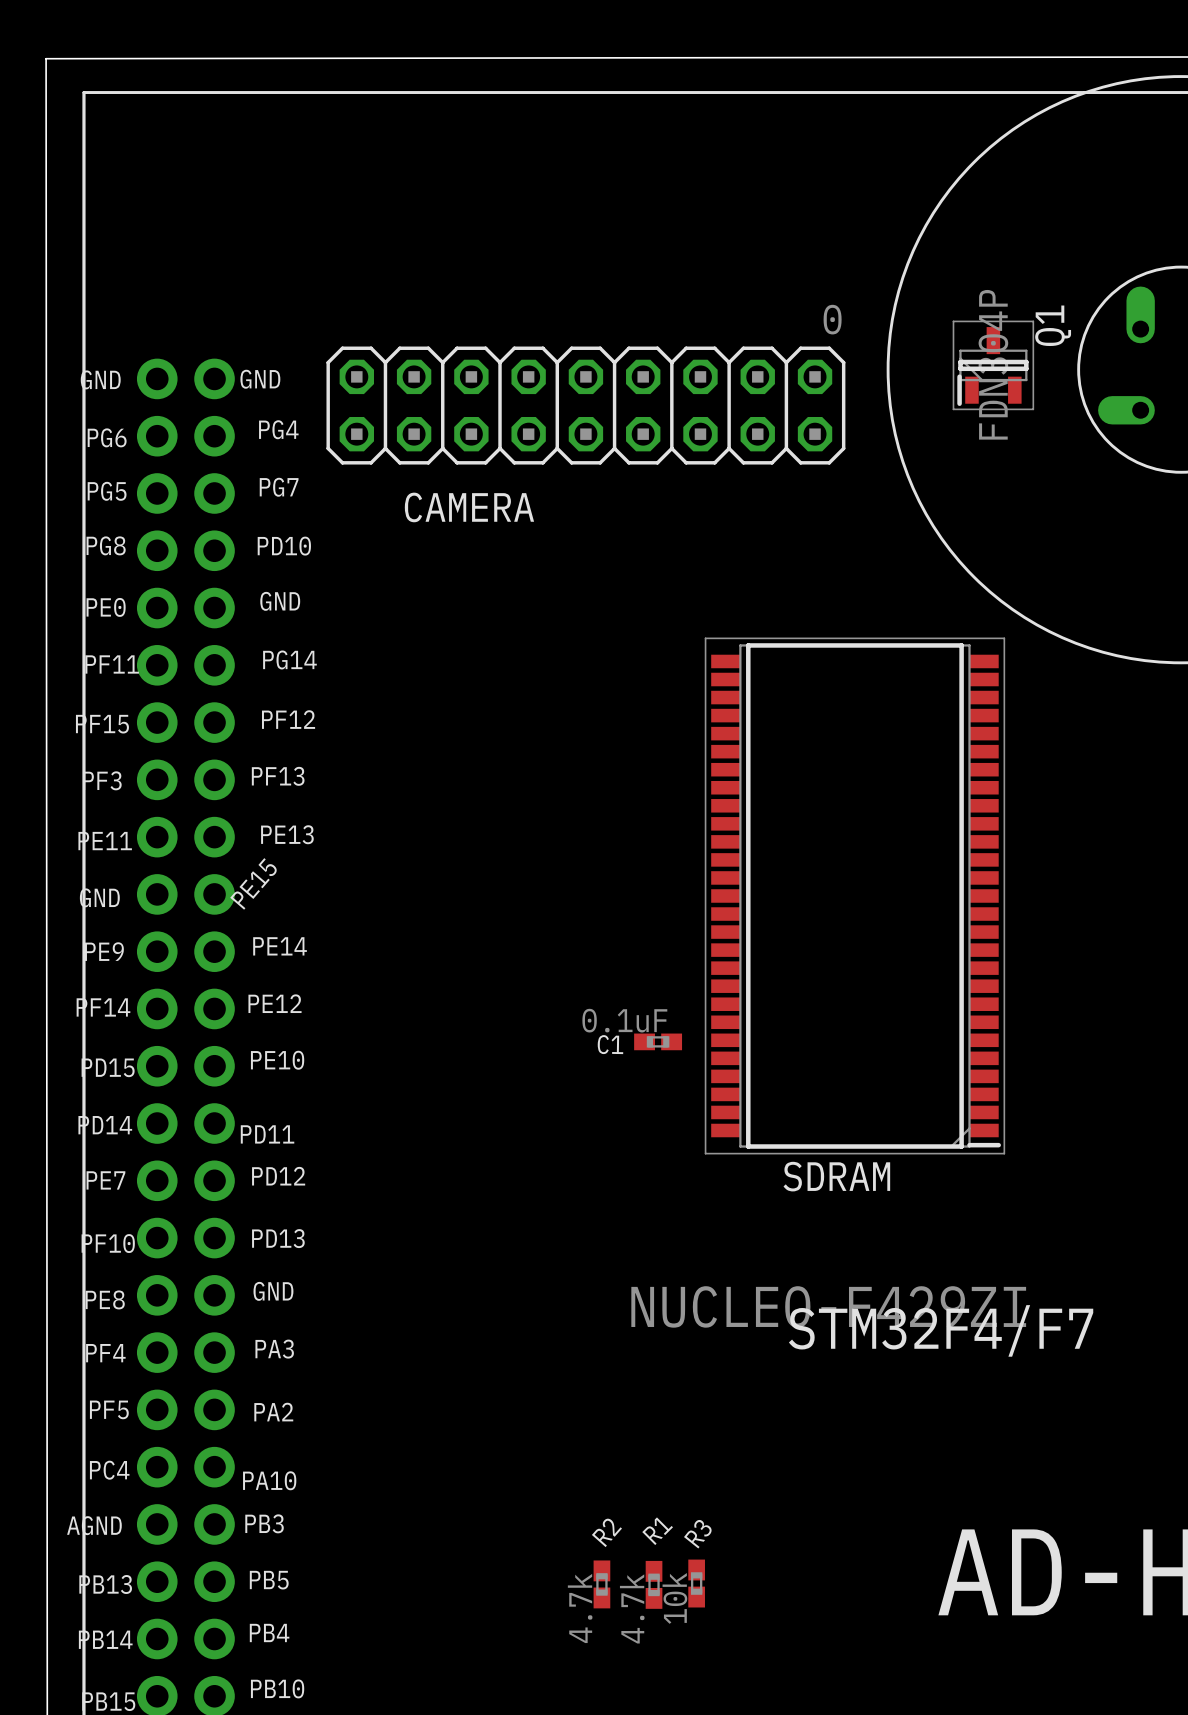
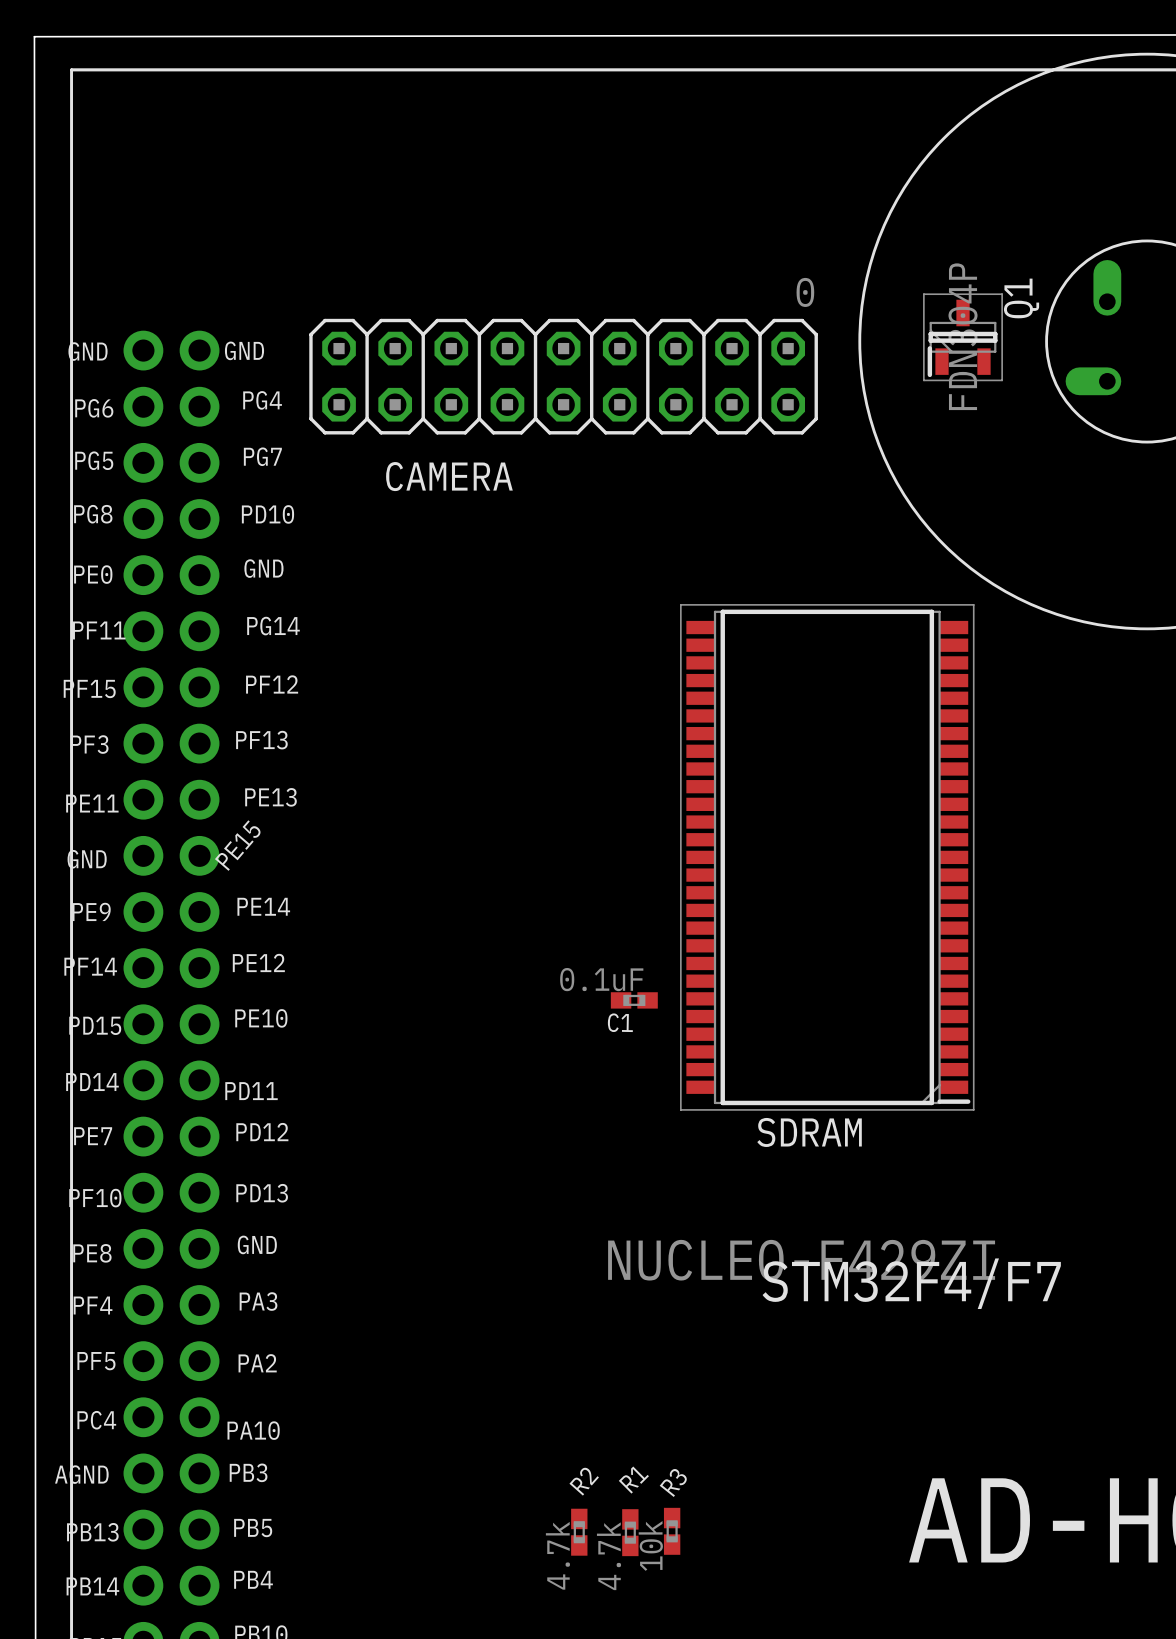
C1 name position: C1 (610, 1044) -> C1 (620, 1022)

